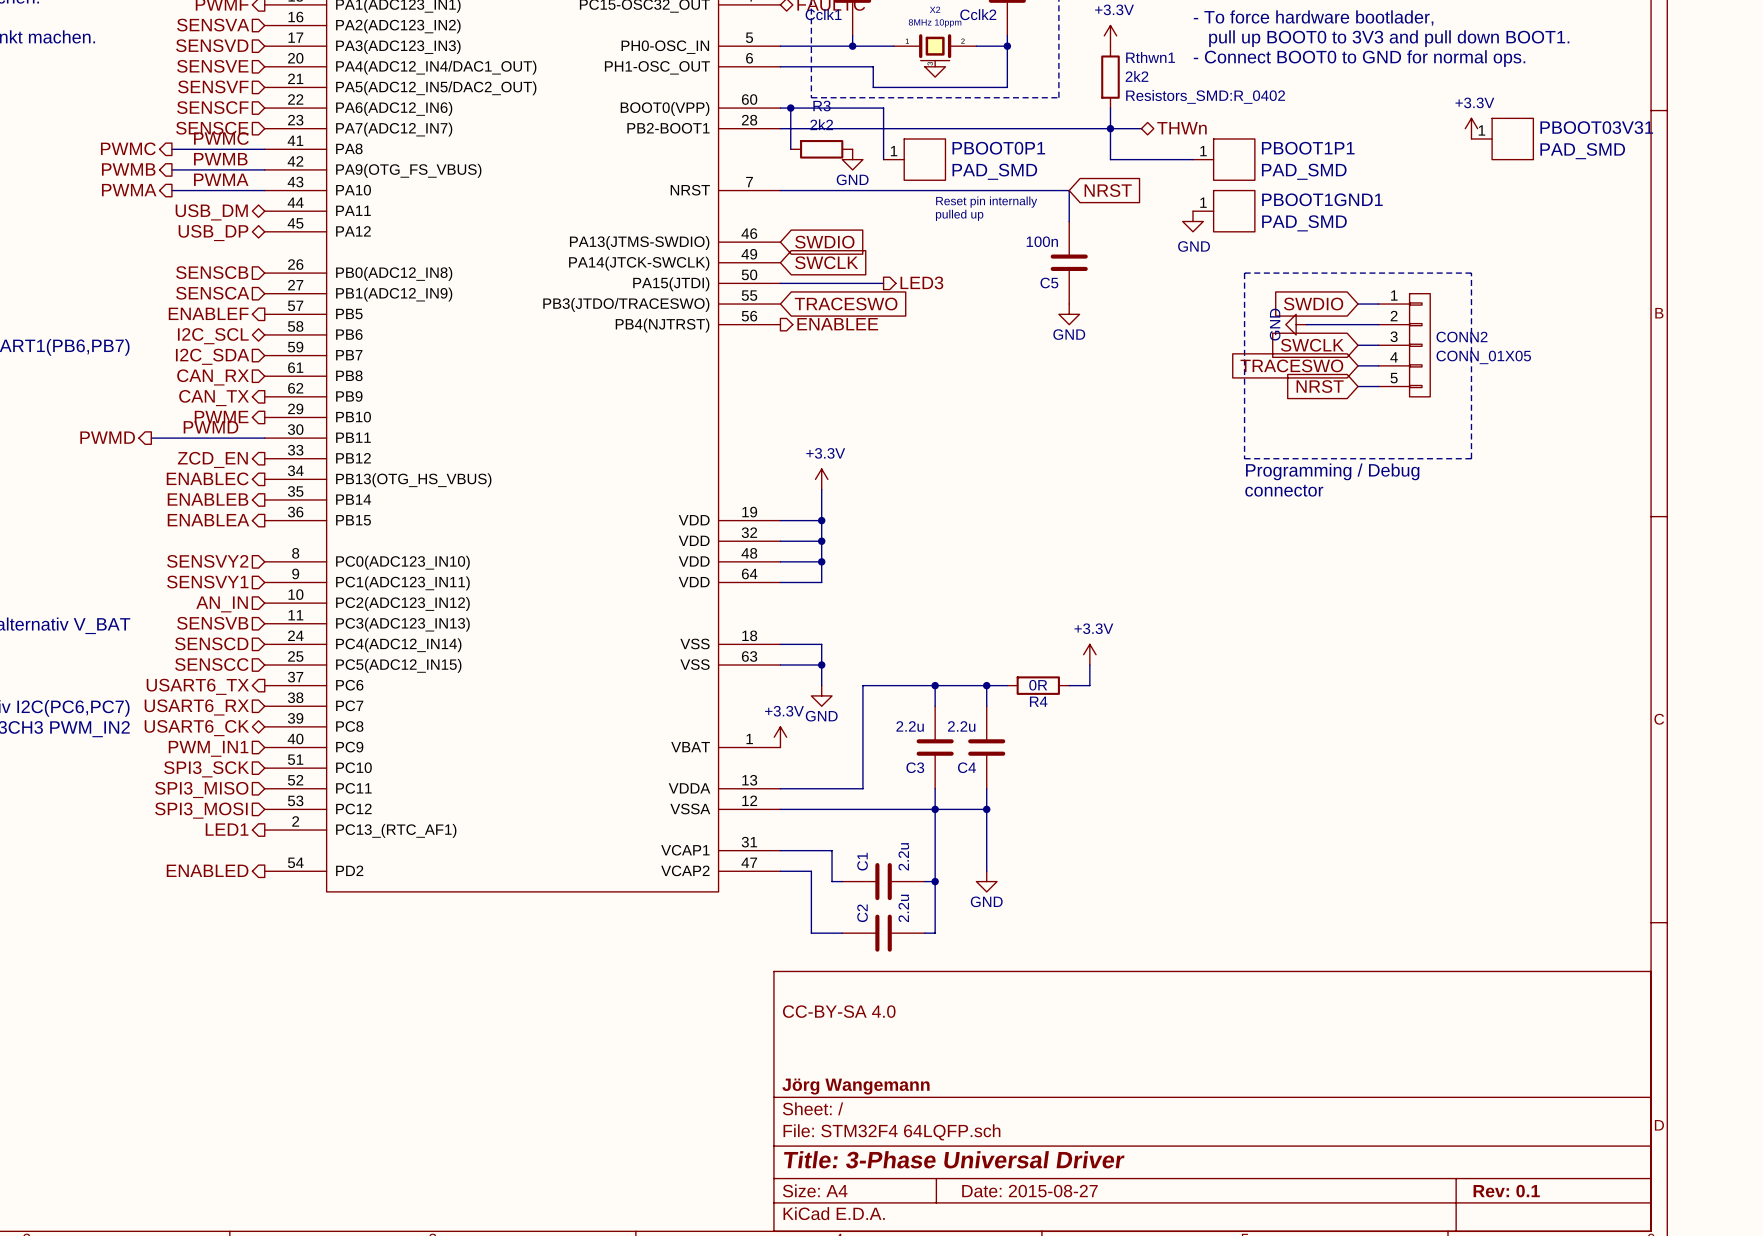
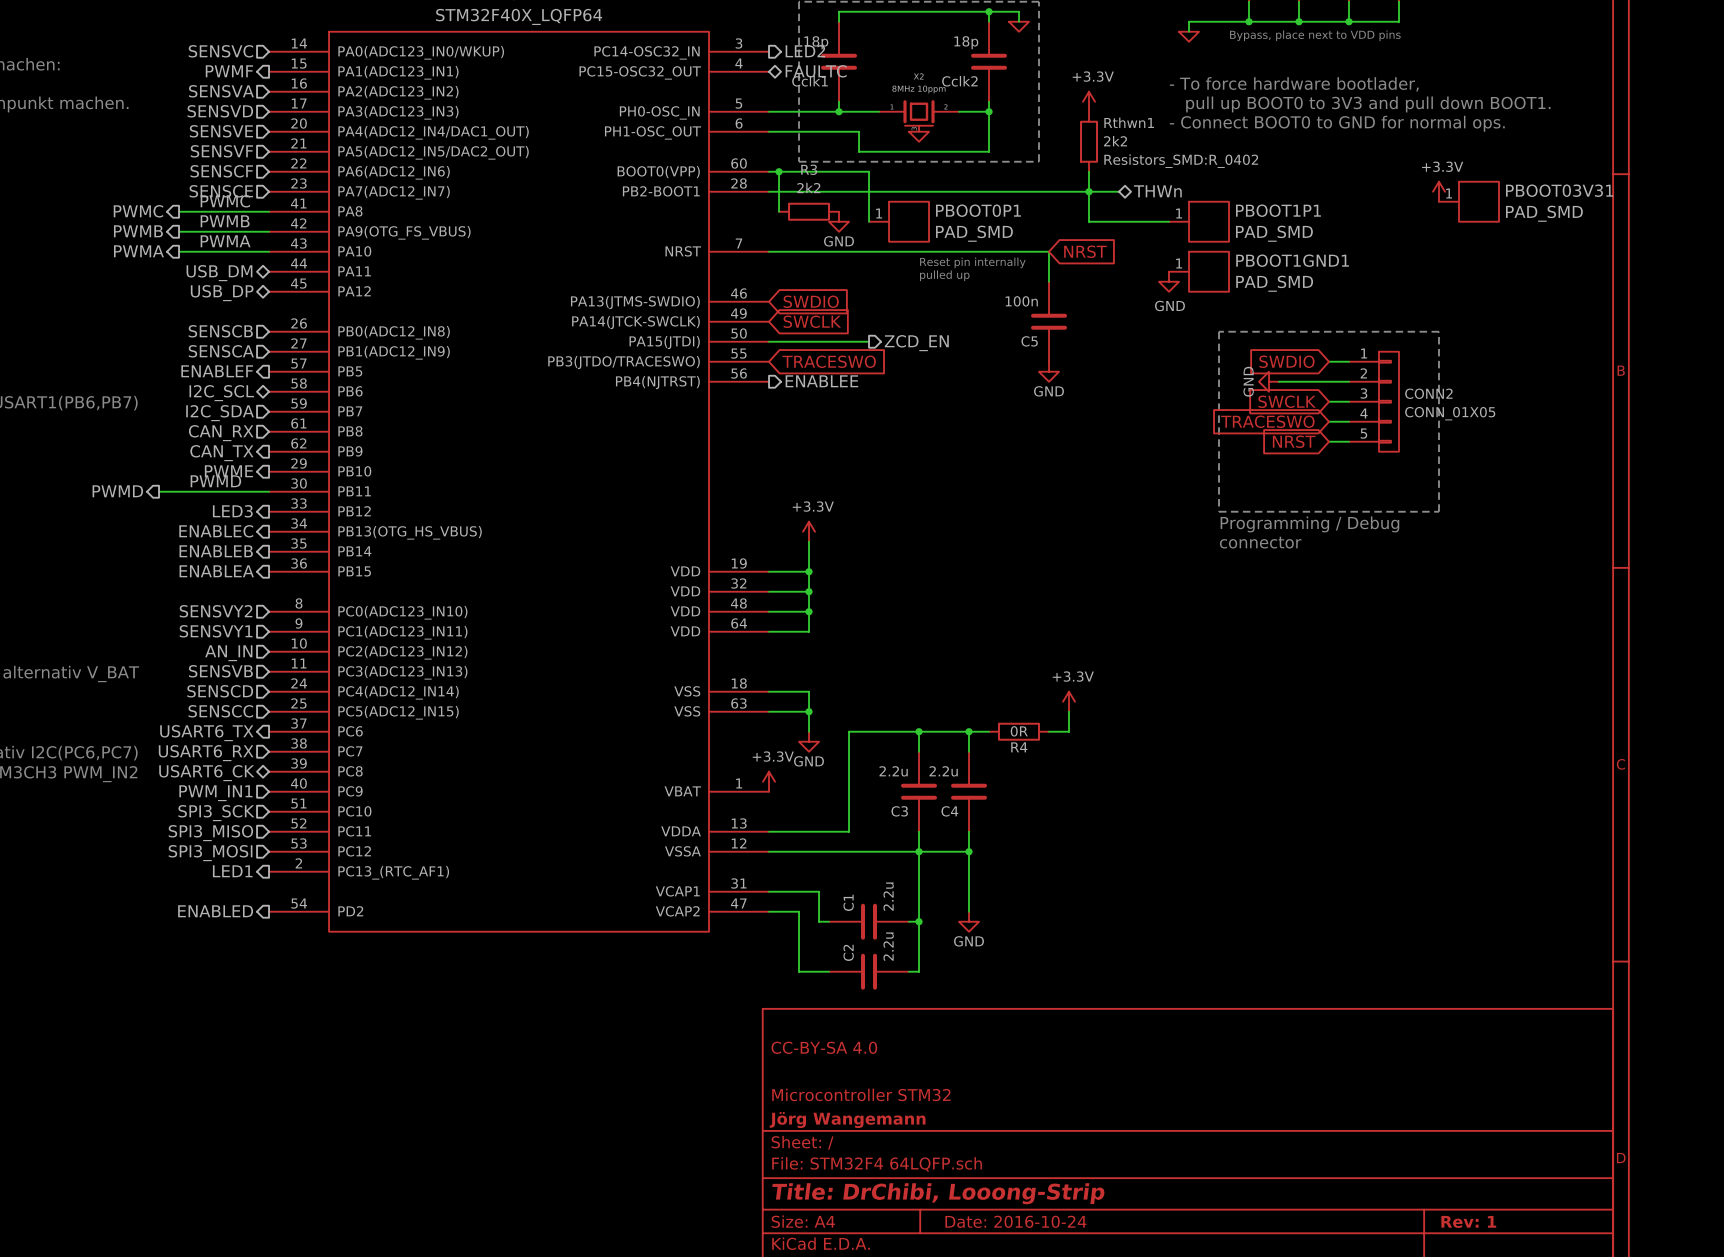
hierarchical label: LED3 (921, 282) -> ZCD_EN (916, 343)
hierarchical label: ZCD_EN (212, 459) -> LED3 (232, 511)
title block: none -> Microcontroller STM32 (861, 1094)
title block: Title: 3-Phase Universal Driver (954, 1159) -> Title: DrChibi, Looong-Strip (938, 1193)
title block: Date: 2015-08-27 (1029, 1191) -> Date: 2016-10-24 (1015, 1221)
title block: Rev: 0.1 (1506, 1191) -> Rev: 1 (1468, 1221)

